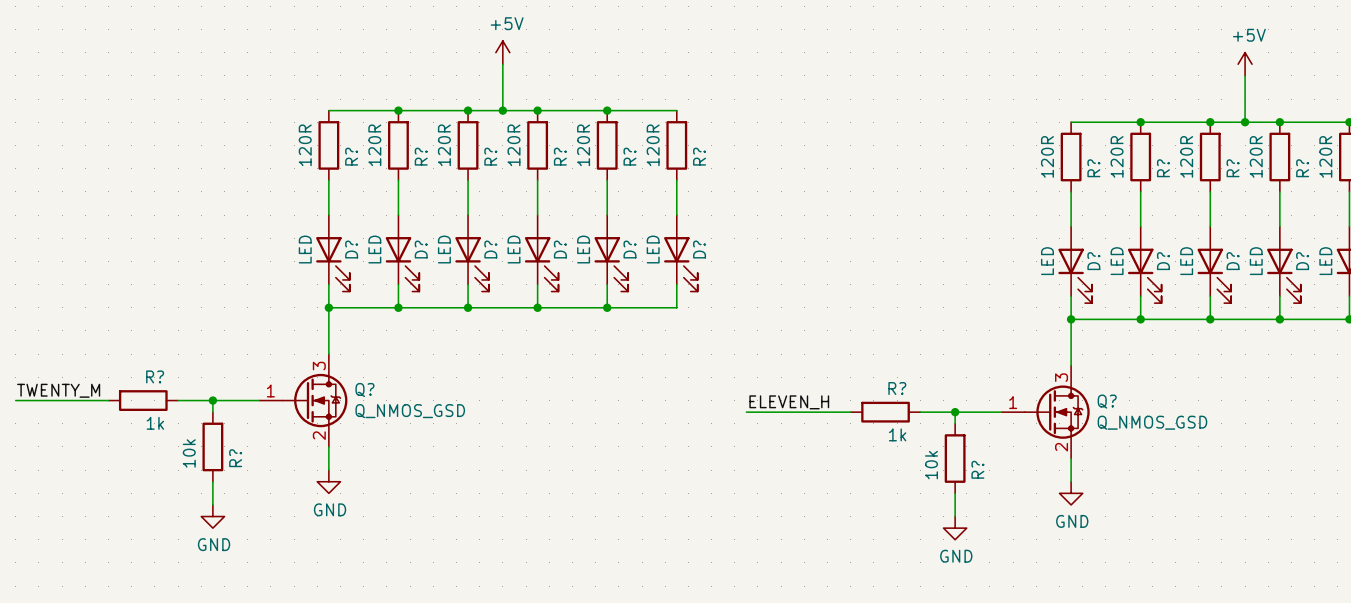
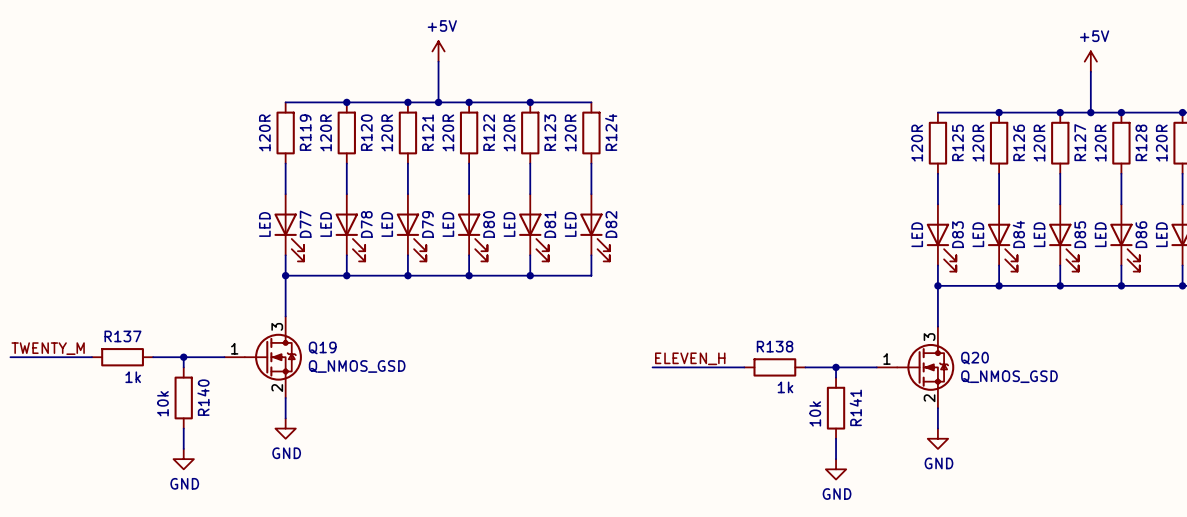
R? name: R? (351, 156) -> R119 (305, 132)
R? name: R? (421, 156) -> R120 (366, 132)
R? name: R? (490, 156) -> R121 (427, 132)
R? name: R? (560, 156) -> R122 (489, 132)
R? name: R? (629, 156) -> R123 (550, 132)
R? name: R? (699, 156) -> R124 (611, 132)
R? name: R? (1093, 168) -> R125 (957, 142)
R? name: R? (1163, 168) -> R126 (1019, 142)
R? name: R? (1233, 168) -> R127 (1080, 142)
R? name: R? (1302, 168) -> R128 (1141, 142)
D? name: D? (351, 249) -> D77 (305, 224)
D? name: D? (421, 249) -> D78 (366, 224)
D? name: D? (490, 249) -> D79 (427, 224)
D? name: D? (560, 249) -> D80 (489, 224)
D? name: D? (629, 249) -> D81 (550, 224)
D? name: D? (699, 249) -> D82 (611, 224)
D? name: D? (1093, 261) -> D83 (957, 234)
D? name: D? (1163, 261) -> D84 (1018, 234)
D? name: D? (1233, 261) -> D85 (1080, 234)
D? name: D? (1302, 261) -> D86 (1141, 234)
R? name: R? (155, 376) -> R137 (122, 336)
R? name: R? (897, 388) -> R138 (775, 346)
Q? name: Q? (364, 390) -> Q19 (322, 347)
Q? name: Q? (1107, 401) -> Q20 (975, 358)
R? name: R? (235, 458) -> R140 (203, 397)
R? name: R? (977, 469) -> R141 (855, 407)

